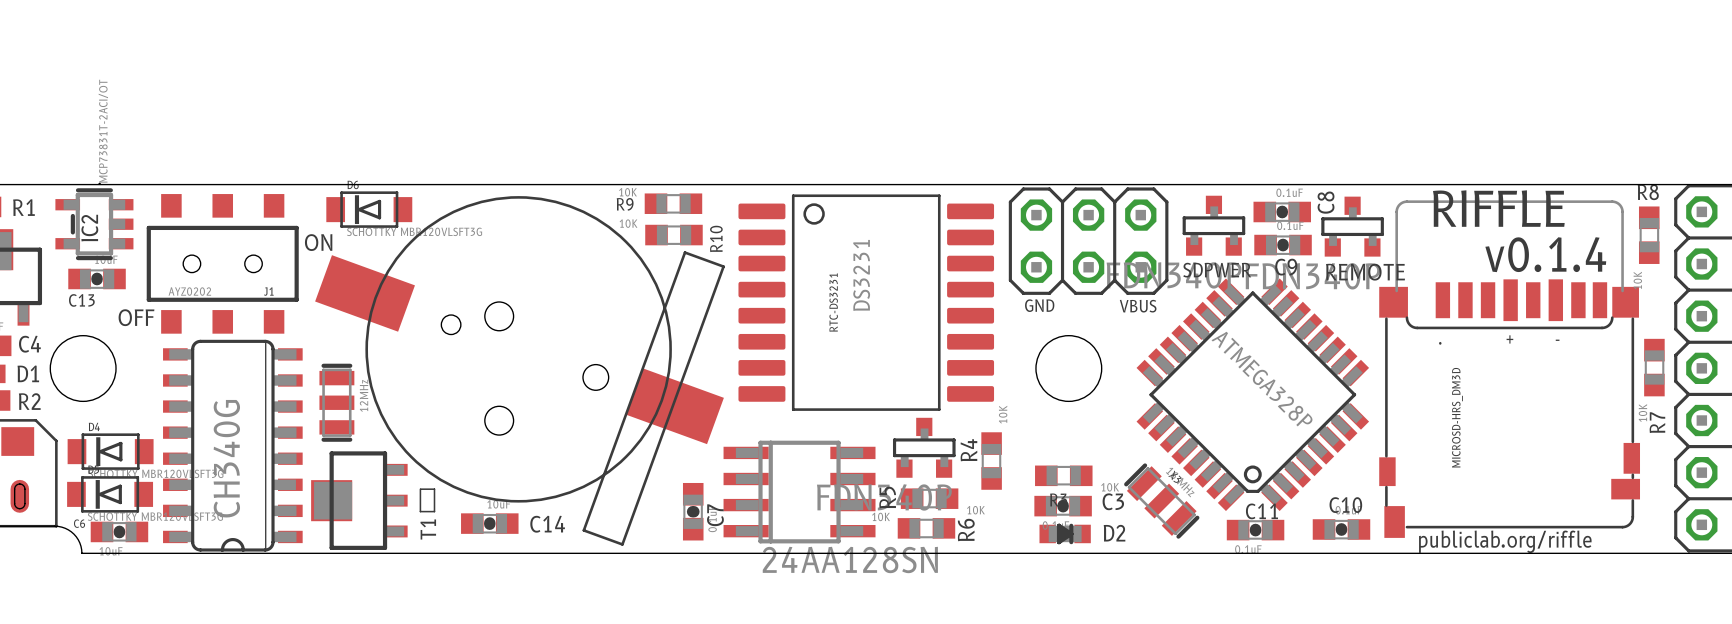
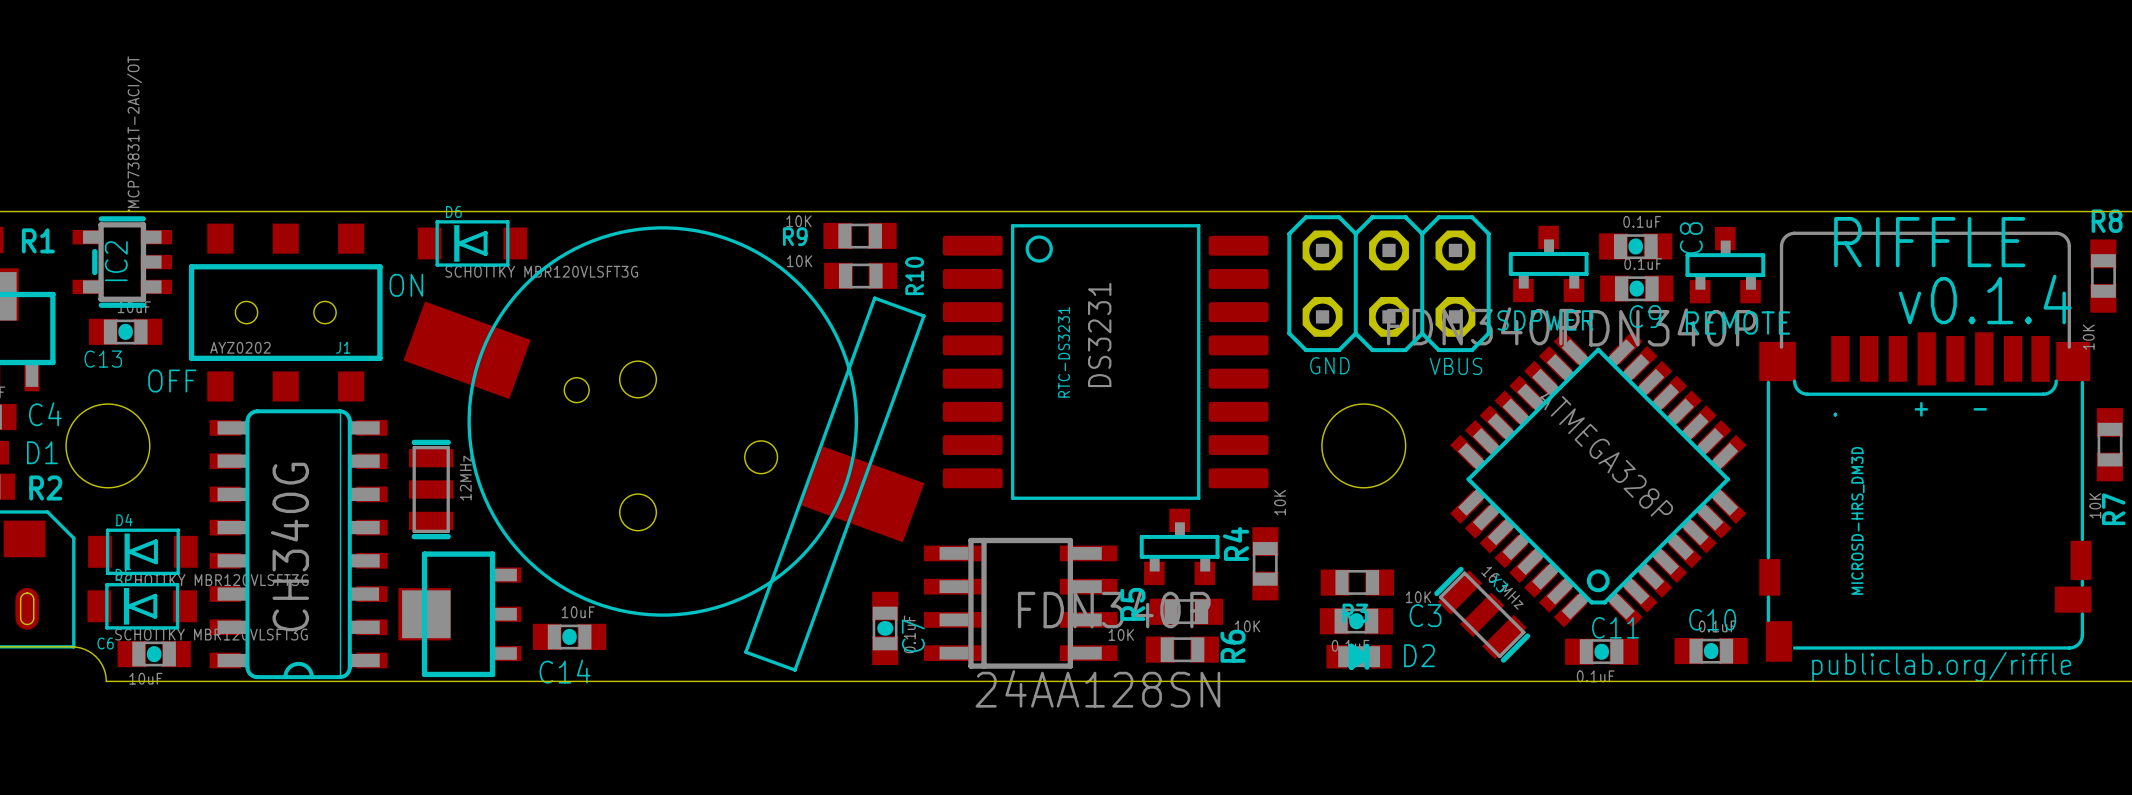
line: (420, 489) (420, 511) (434, 511) (434, 489) (420, 489) -> none
C14 position: (489, 523) -> (569, 636)
C14 name position: C14 (547, 524) -> C14 (564, 671)
text: T1 (428, 529) -> none

